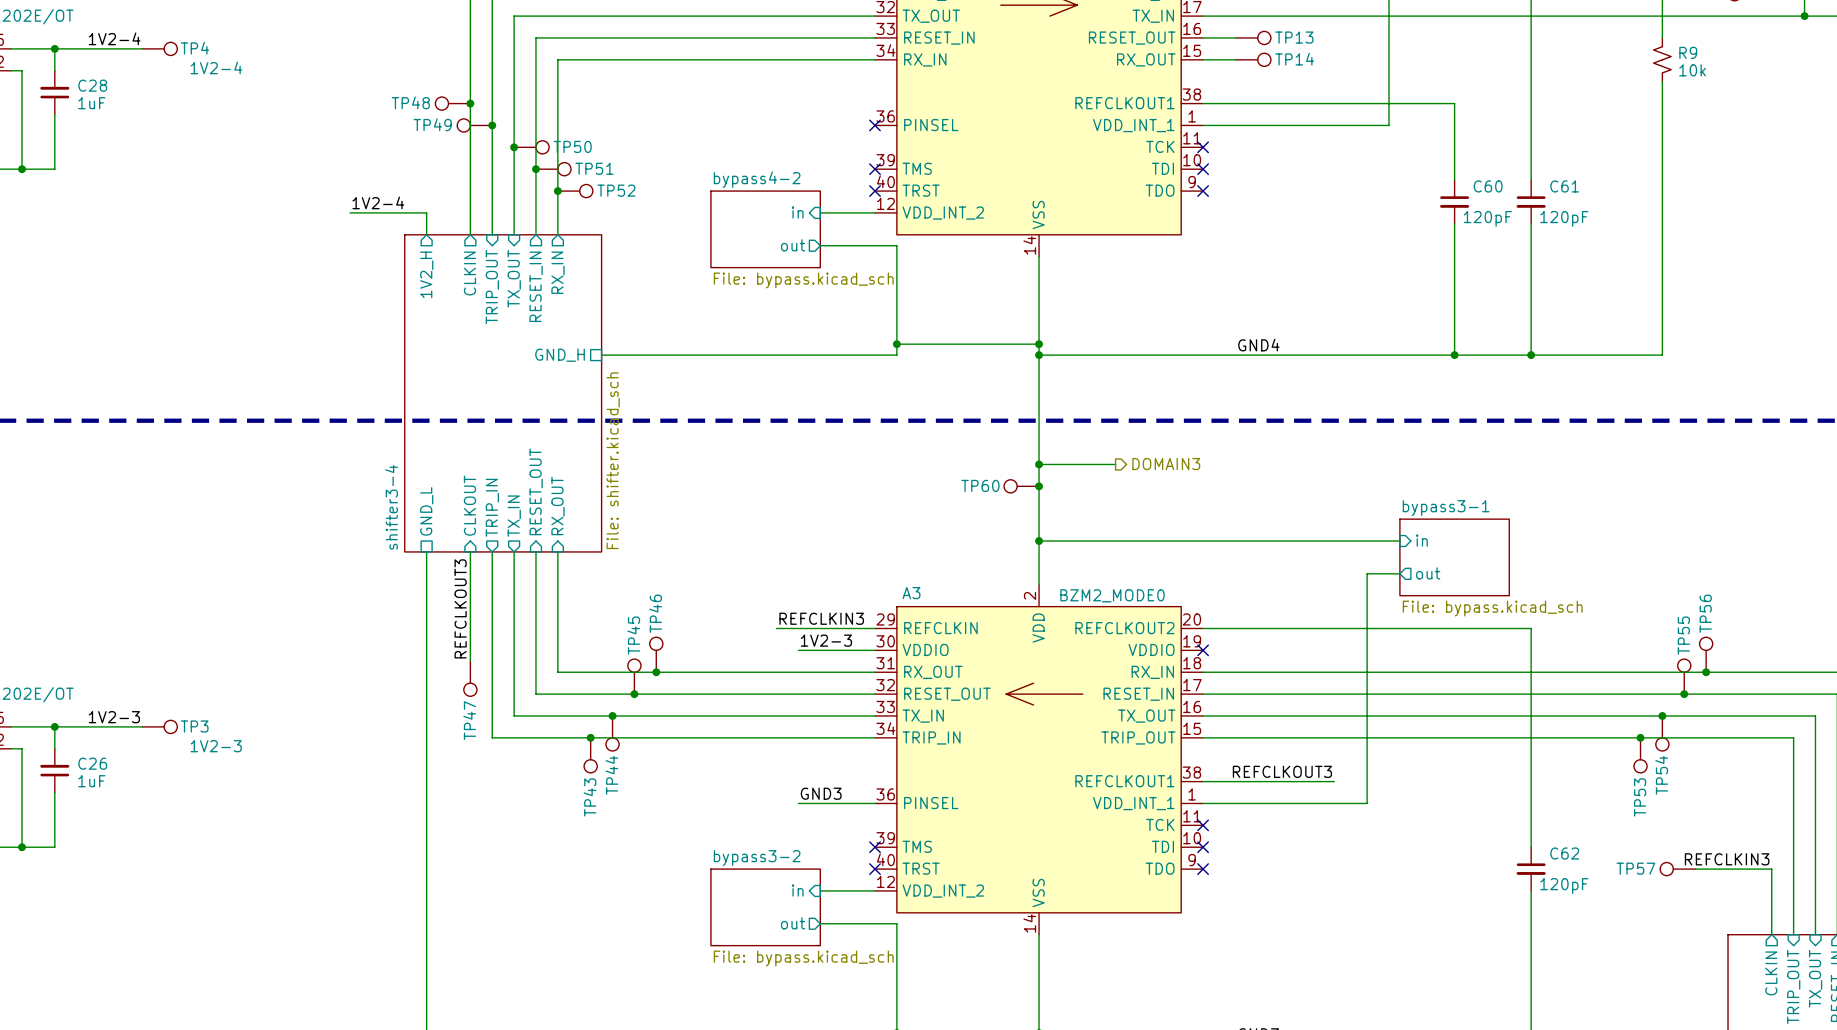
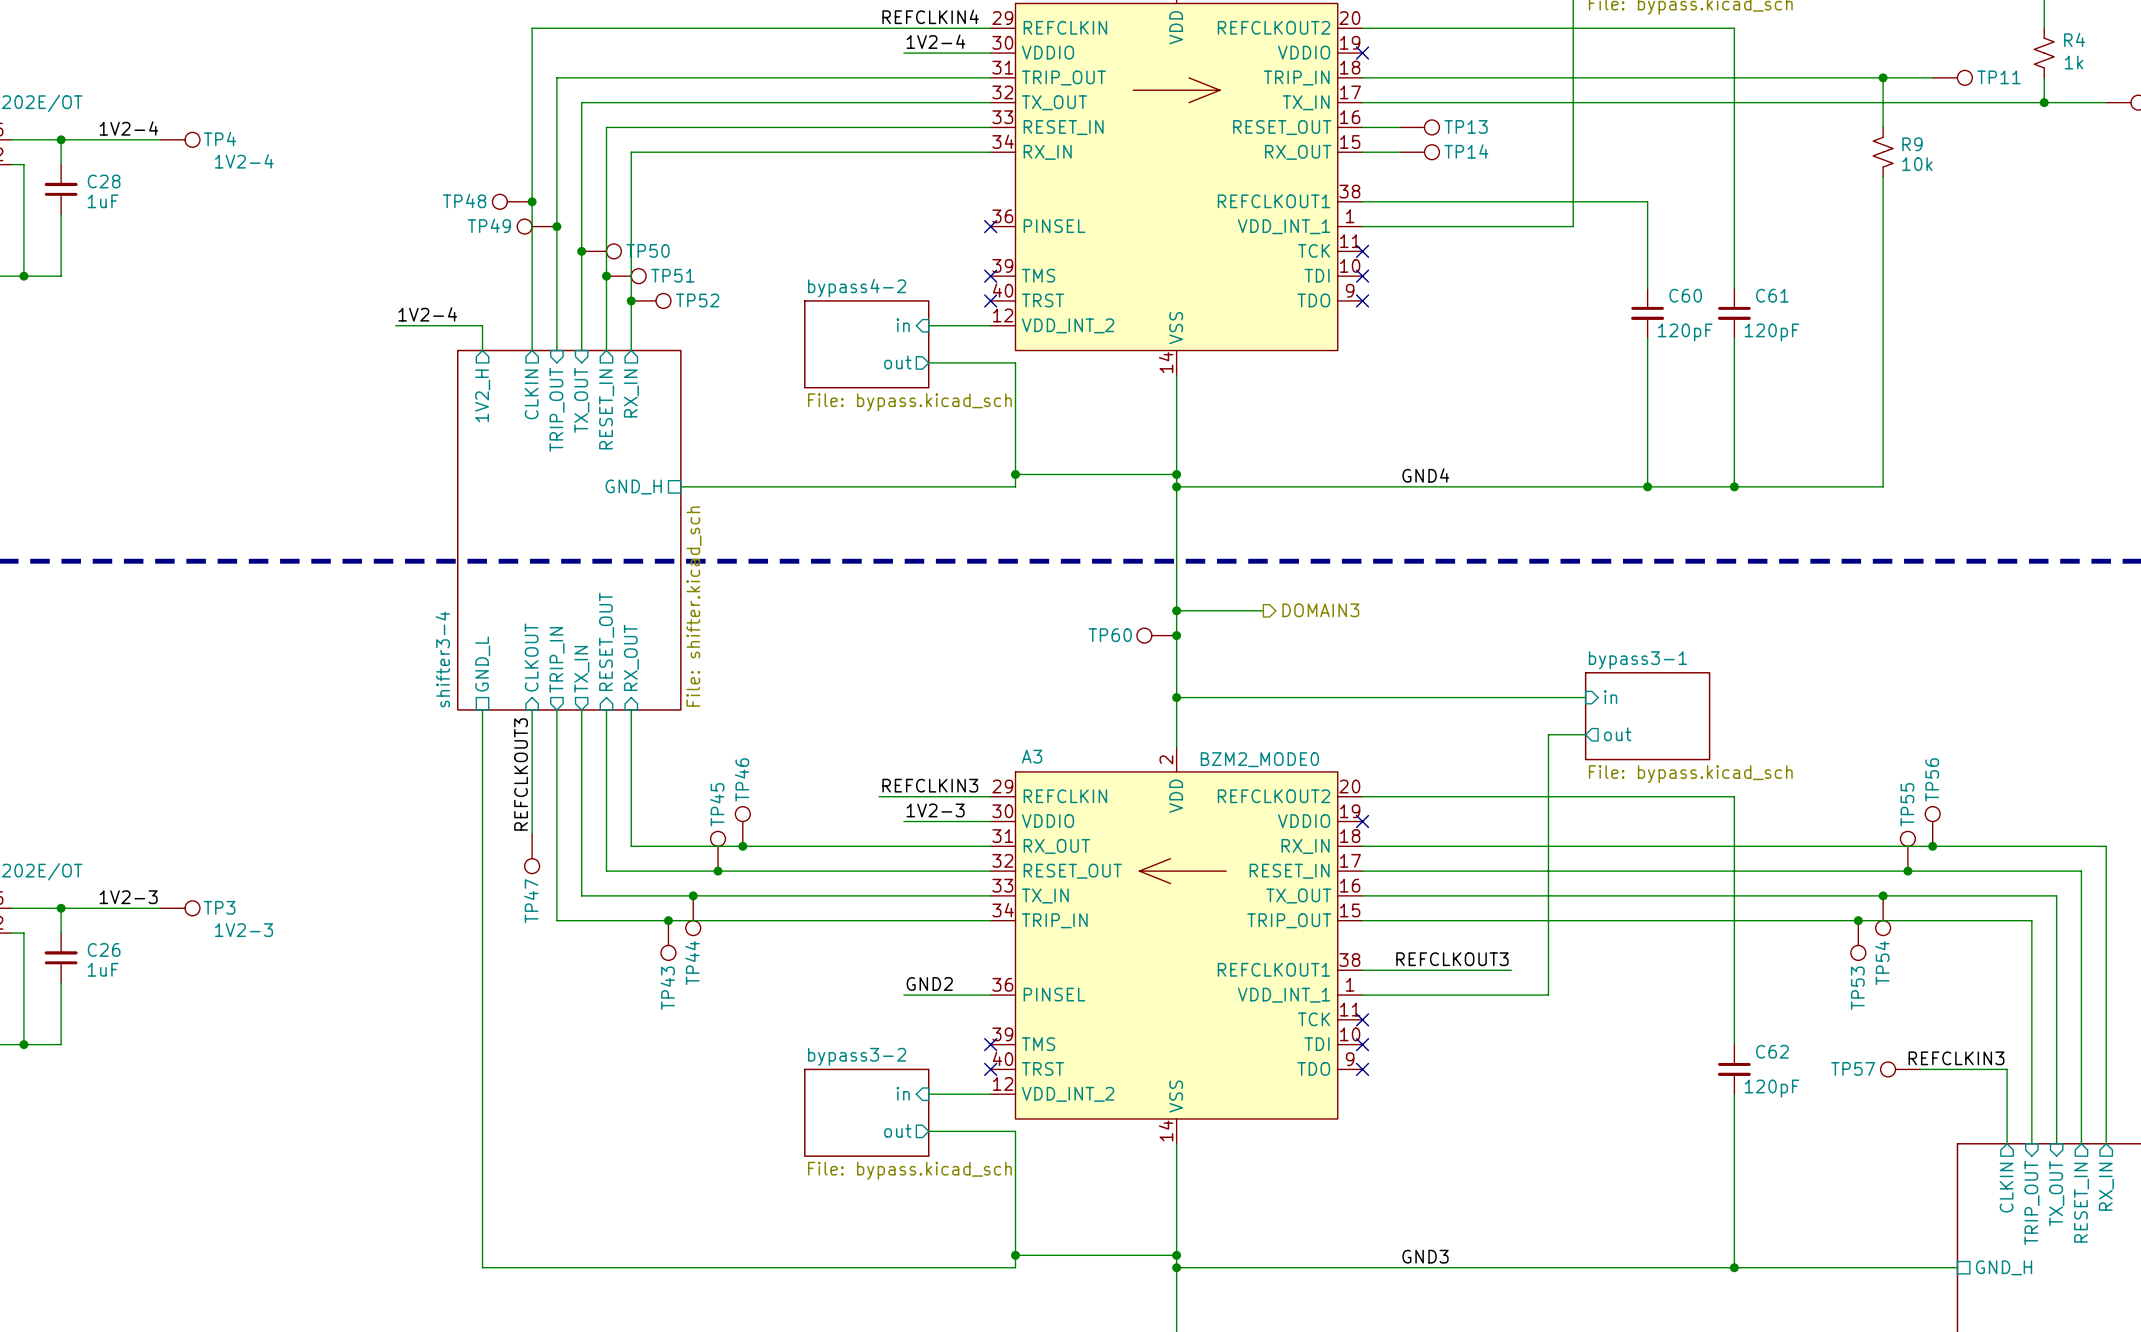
label: GND3 (821, 793) -> GND2 (929, 983)

